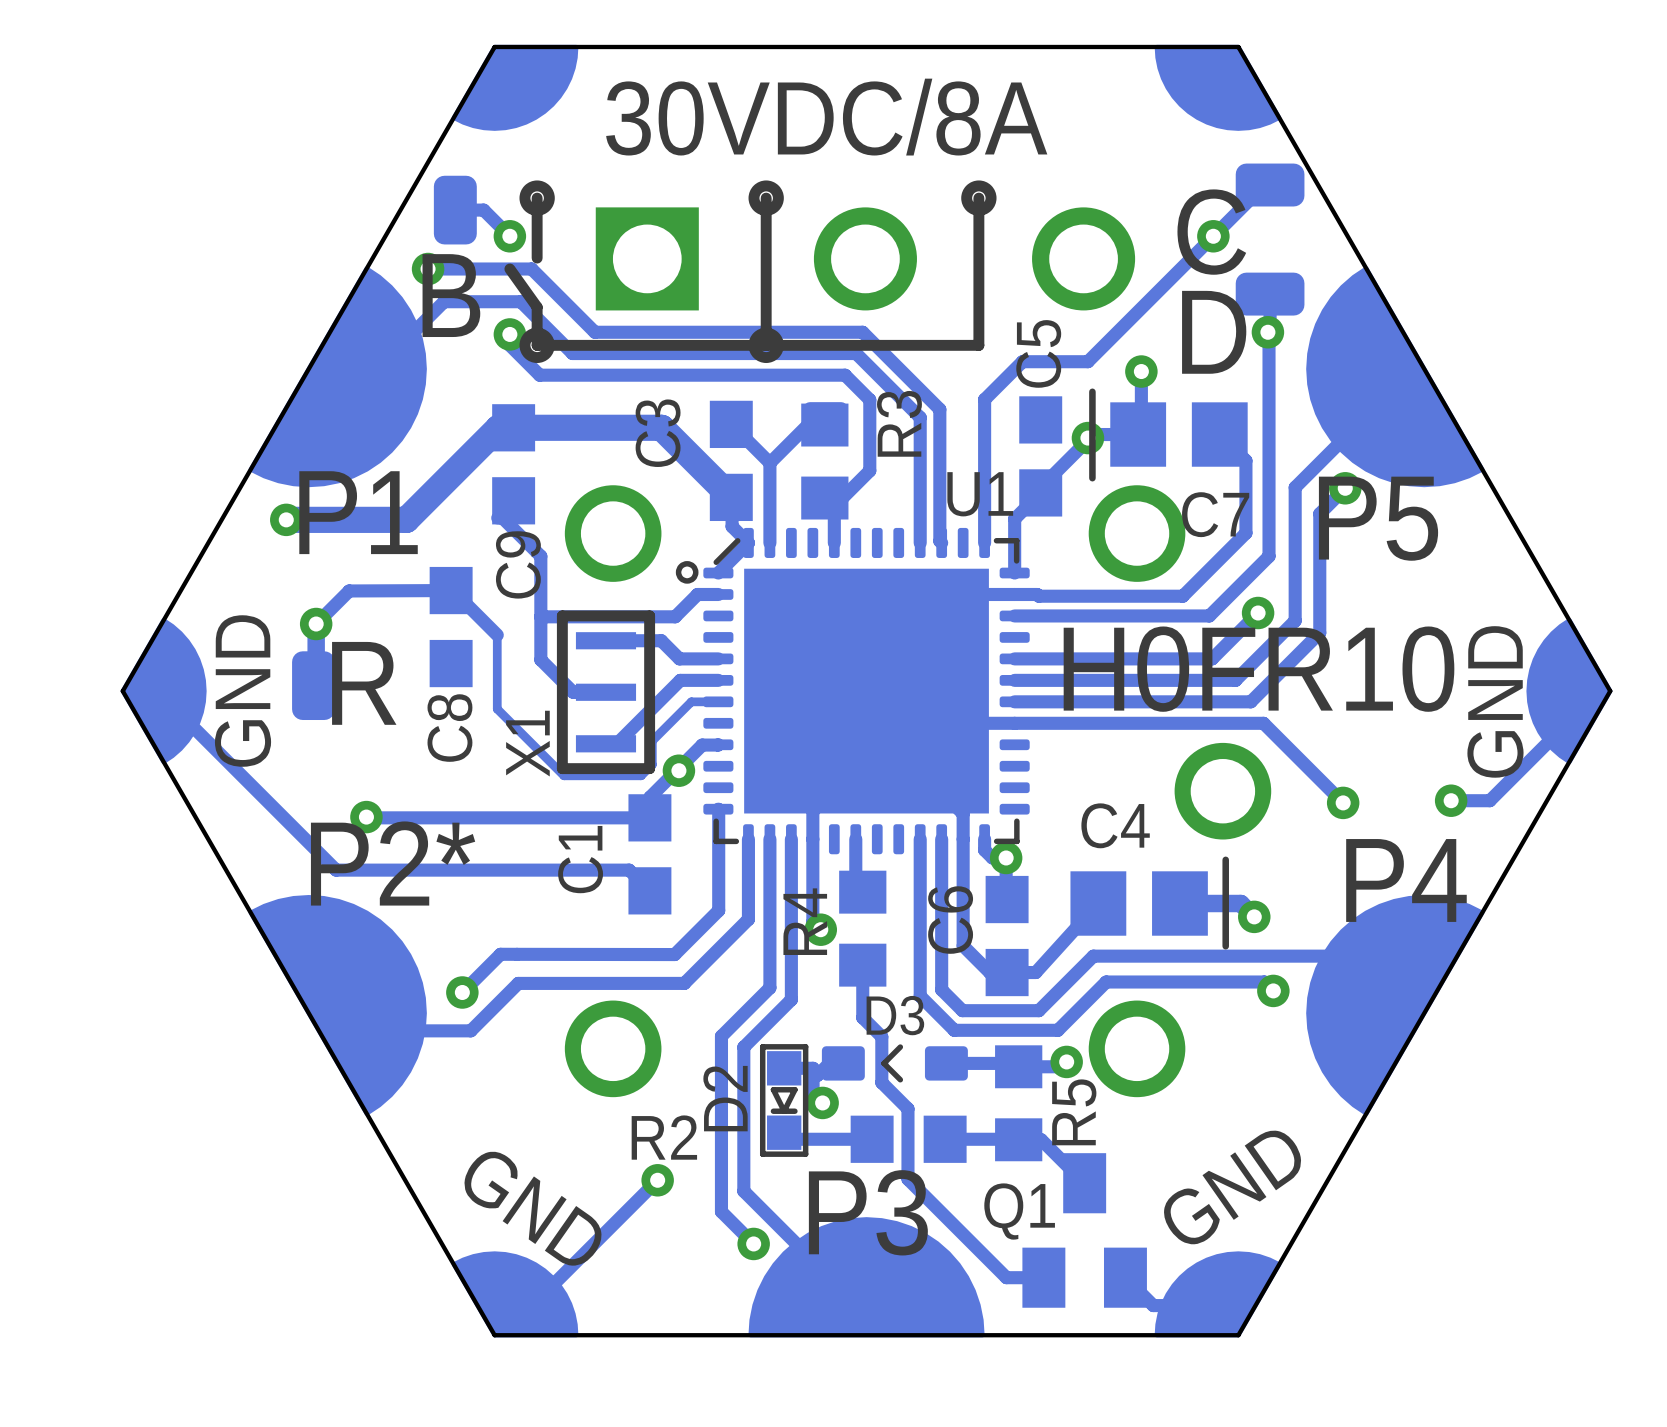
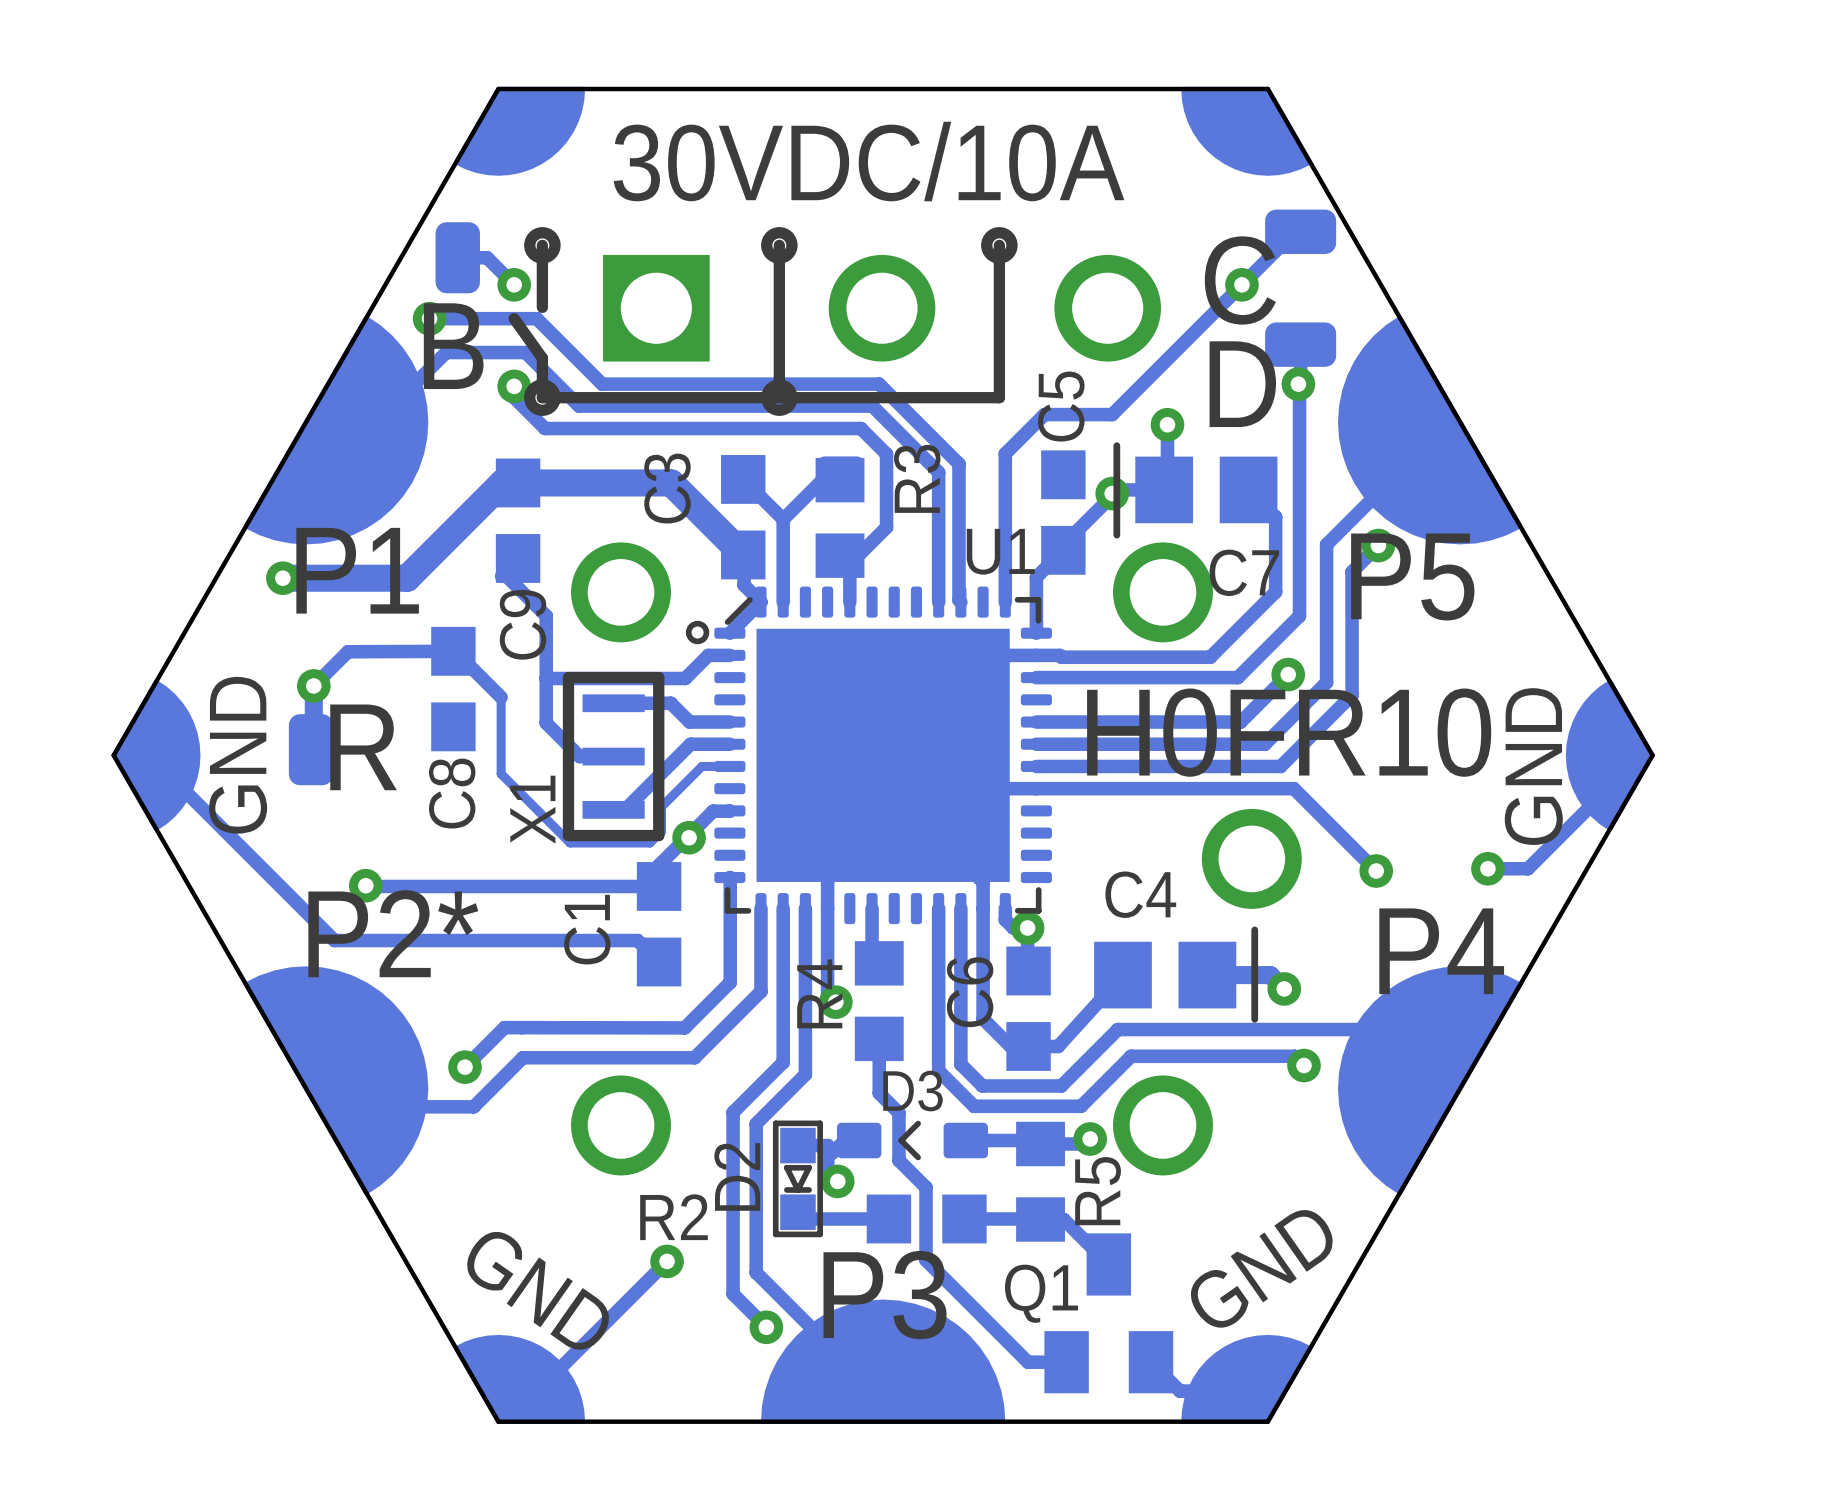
text: 30VDC/8A (826, 117) -> 30VDC/10A (869, 161)

